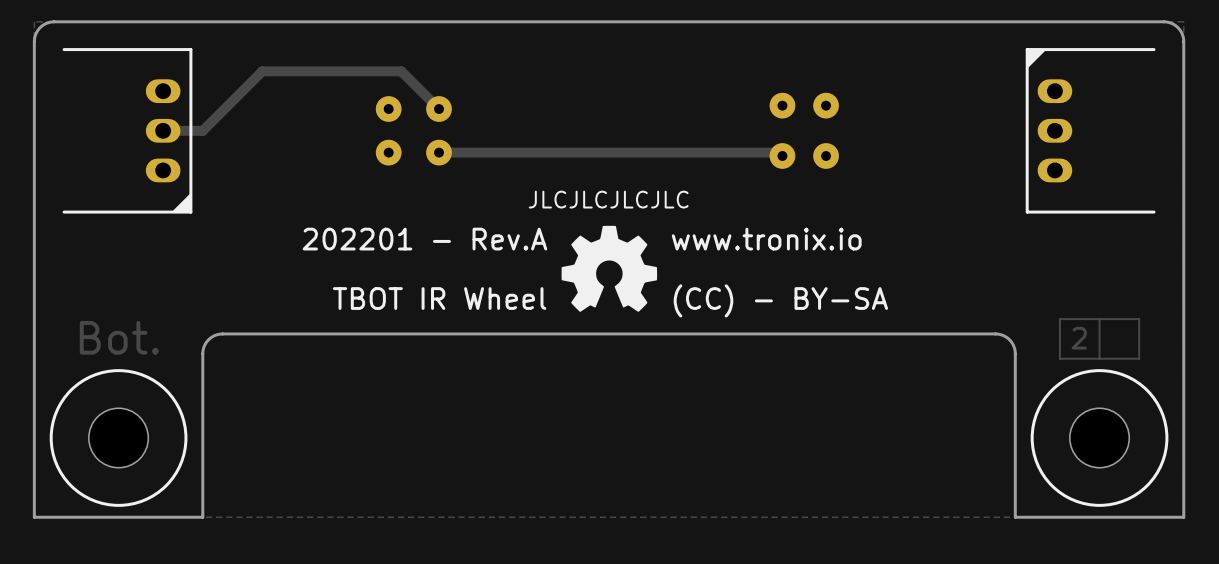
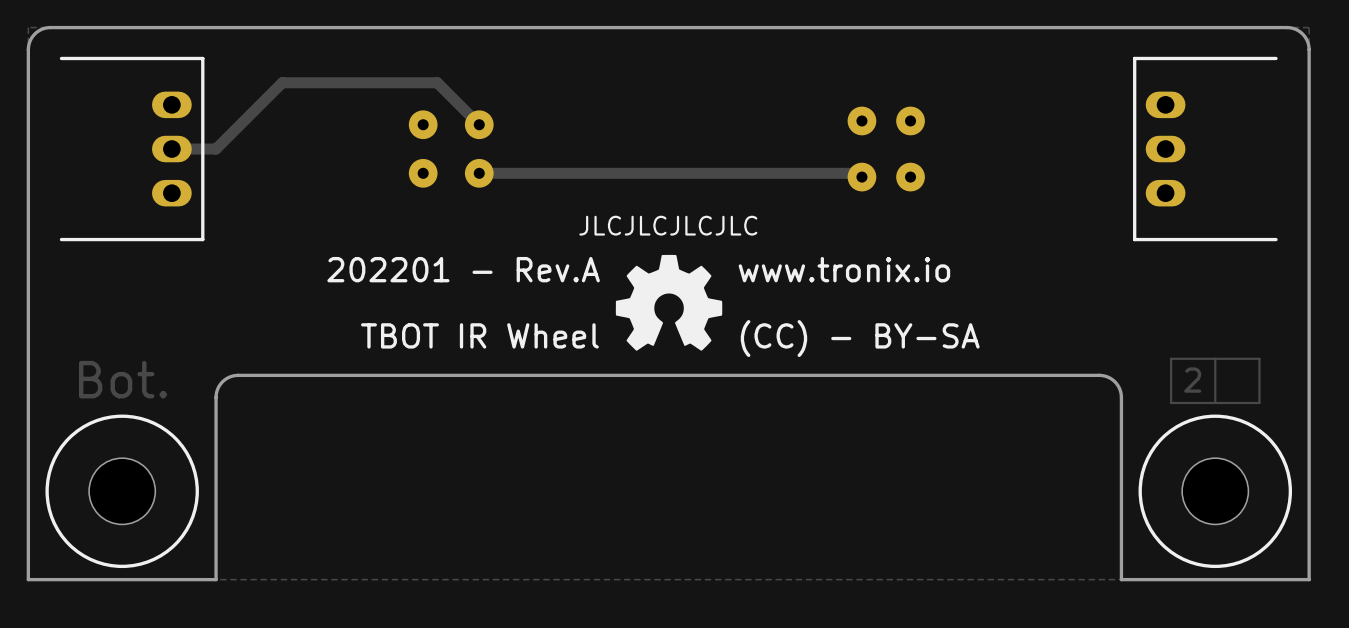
part footprint: [62, 48, 193, 214] -> [59, 56, 205, 242]
part footprint: [1025, 48, 1156, 214] -> [1133, 56, 1278, 242]

